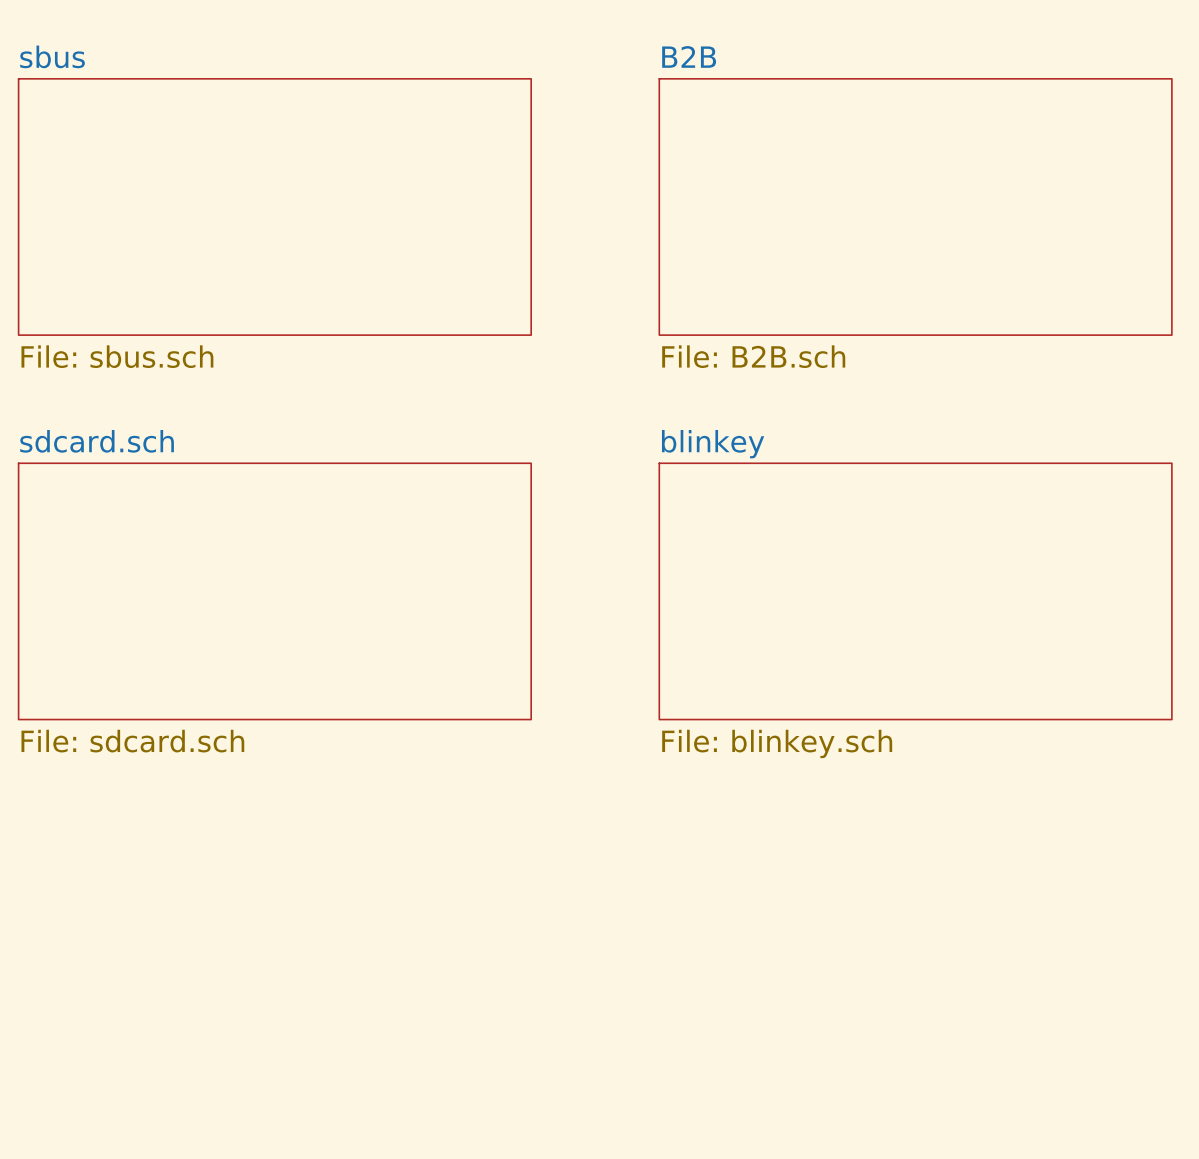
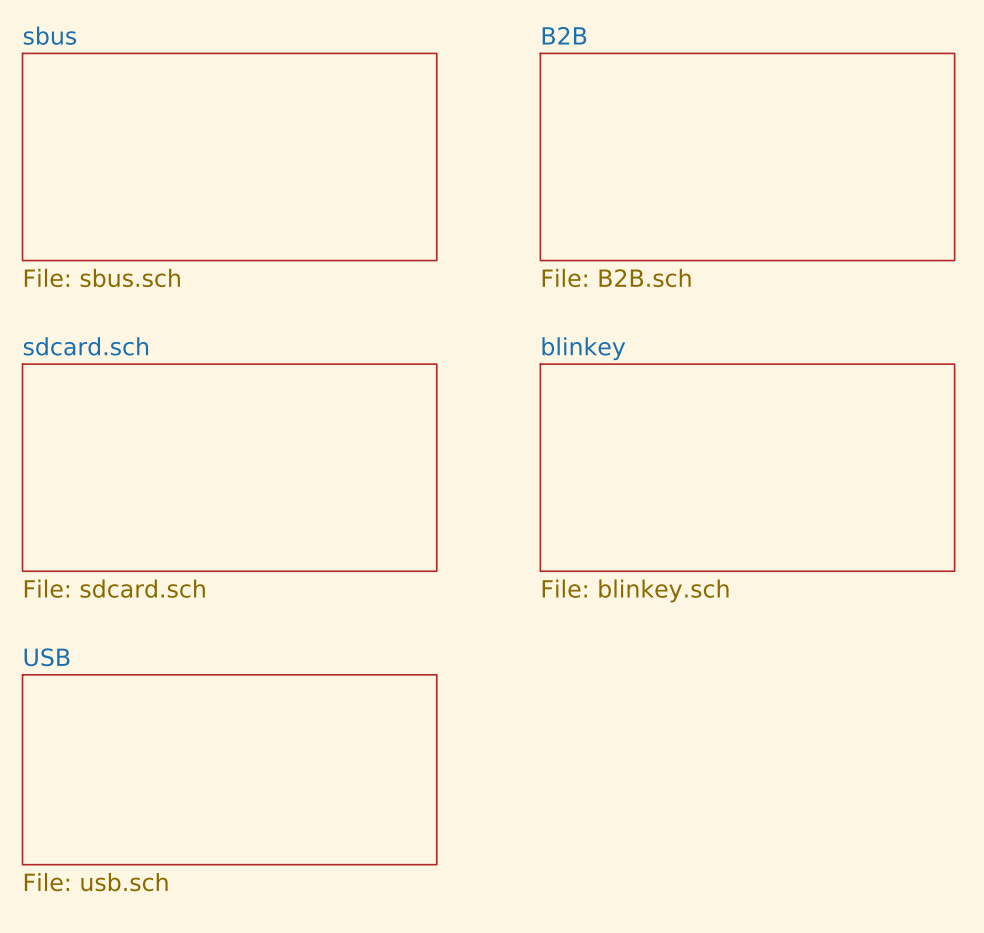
sheet USB: none -> File: usb.sch (229, 769)

